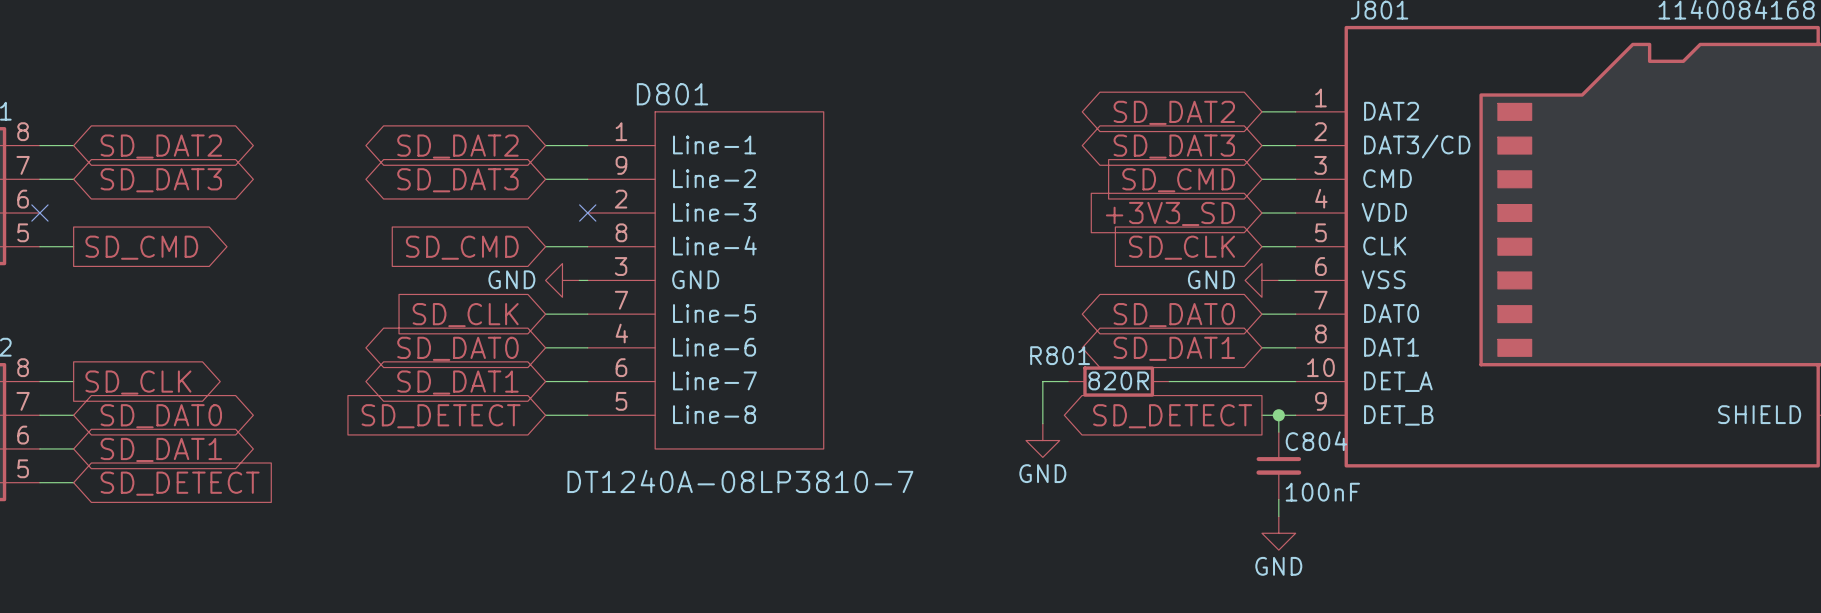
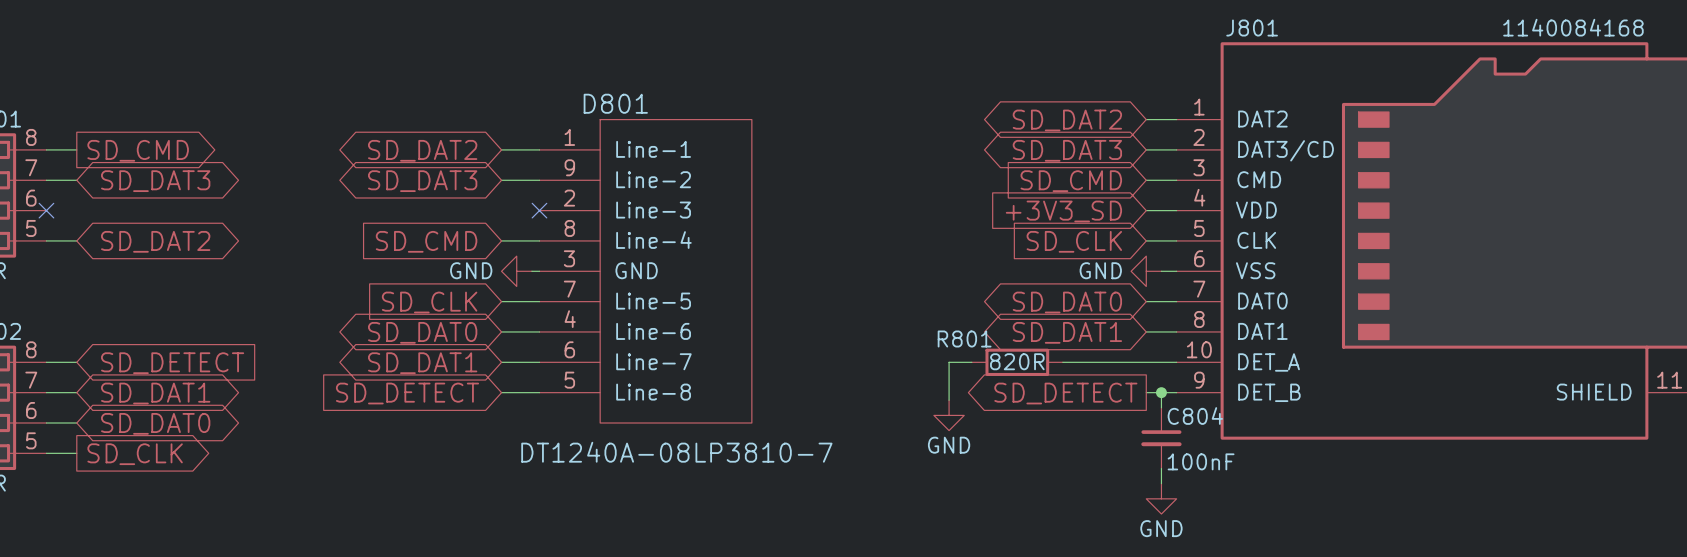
global label shape: bidirectional (161, 146) -> output (138, 150)
global label: SD_DAT2 (161, 146) -> SD_CMD (138, 150)
global label shape: output (141, 247) -> bidirectional (155, 241)
global label: SD_CMD (141, 247) -> SD_DAT2 (155, 241)
global label shape: output (138, 382) -> input (172, 363)
global label: SD_CLK (138, 382) -> SD_DETECT (172, 363)
global label: SD_DAT0 (161, 416) -> SD_DAT1 (155, 393)
global label: SD_DAT1 (161, 449) -> SD_DAT0 (155, 423)
global label shape: input (180, 483) -> output (135, 454)
global label: SD_DETECT (180, 483) -> SD_CLK (135, 454)

